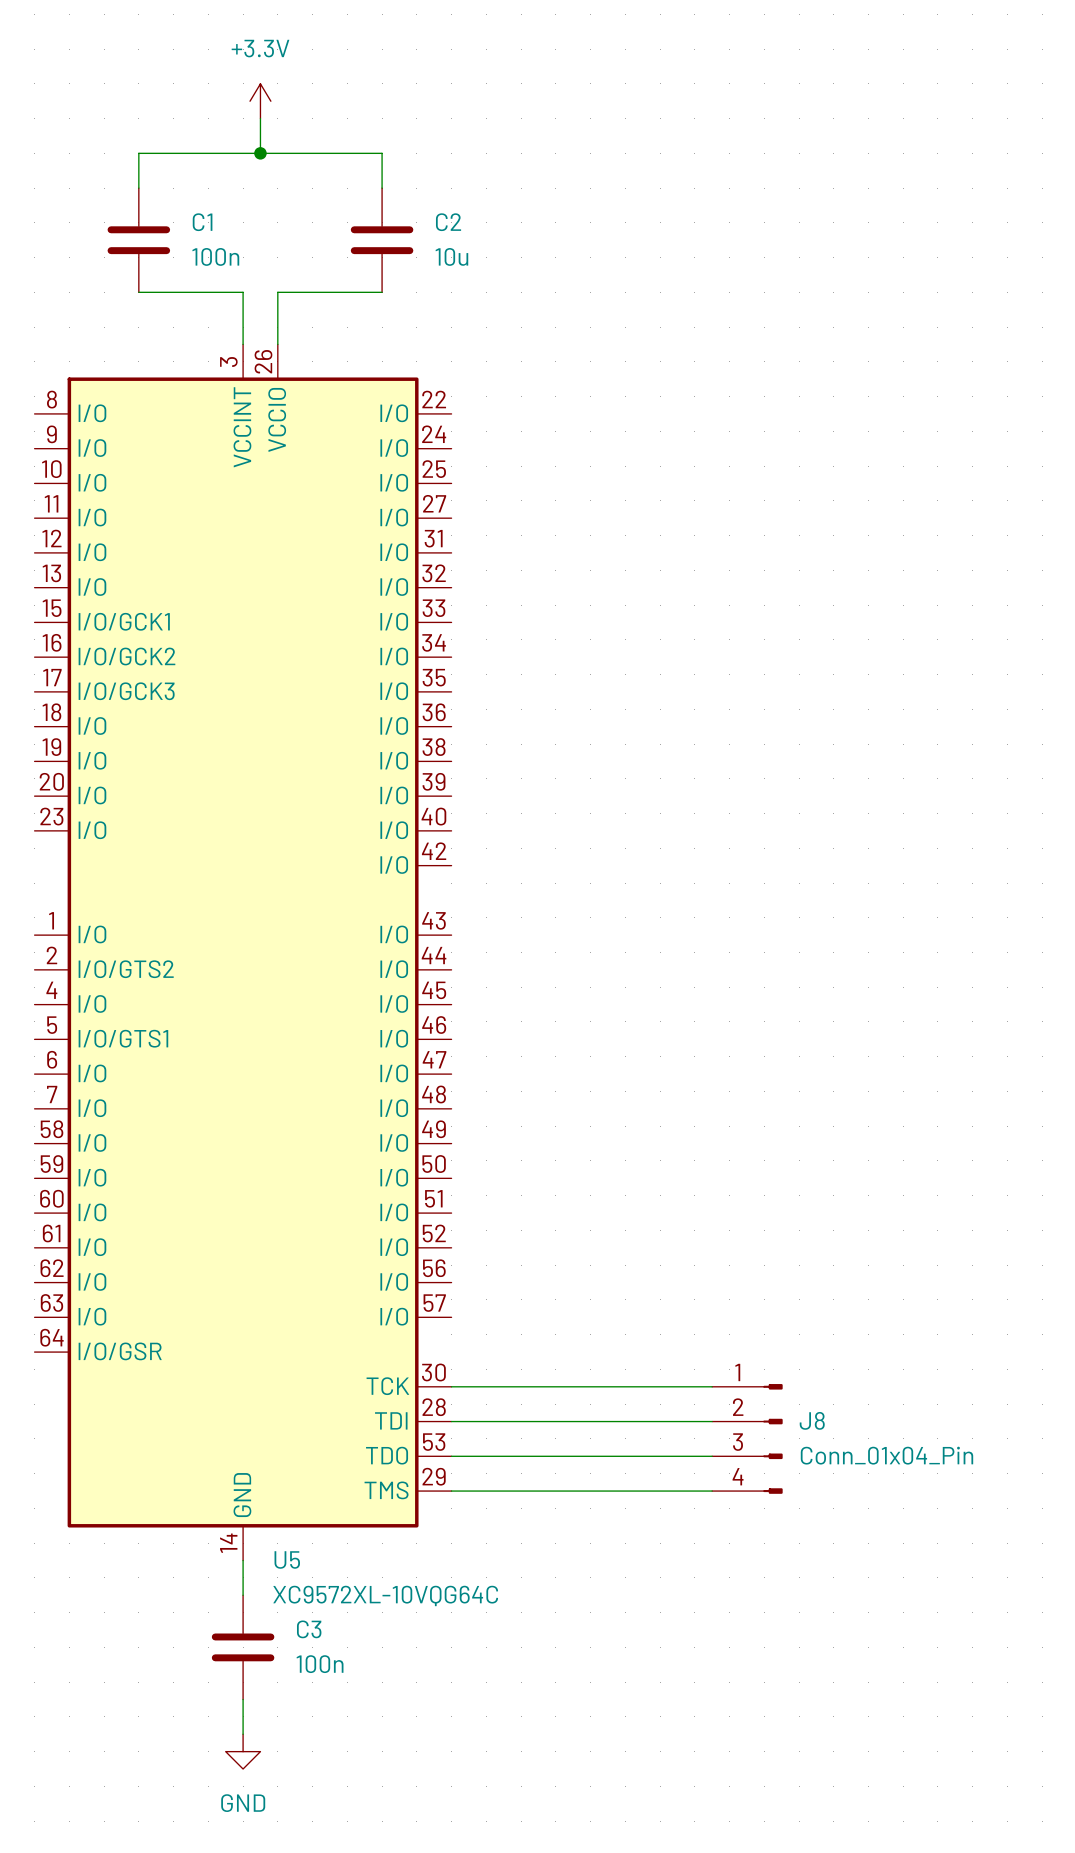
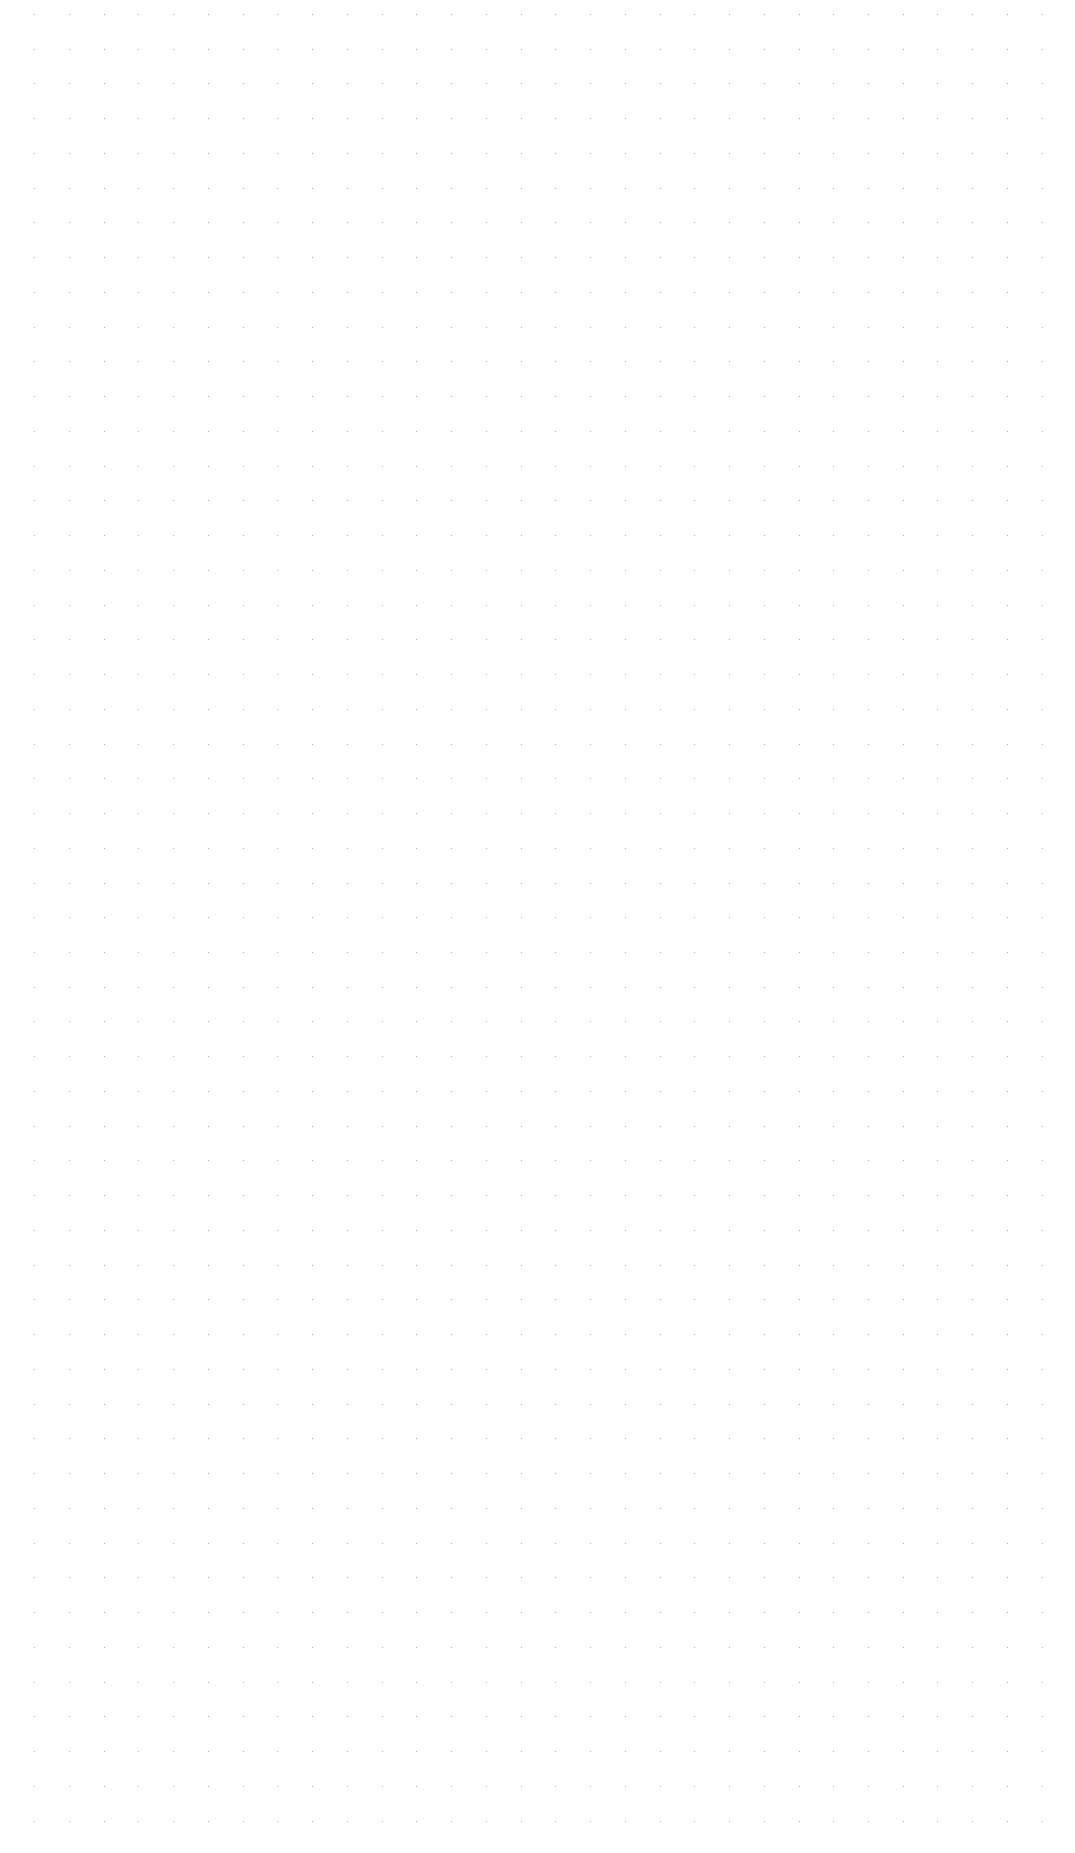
power symbol: +3.3V (260, 101) -> none
wire: (260, 118) (260, 153) -> none
junction: (260, 153) -> none
wire: (138, 188) (138, 153) (382, 153) (382, 188) -> none
C1: 100n (138, 240) -> none
C2: 10u (382, 240) -> none
wire: (138, 292) (243, 292) (243, 344) -> none
wire: (382, 292) (277, 292) (277, 344) -> none
U5: XC9572XL-10VQG64C (243, 952) -> none
wire: (451, 1386) (712, 1386) -> none
wire: (451, 1421) (712, 1421) -> none
J8: Conn_01x04_Pin (747, 1438) -> none
wire: (451, 1456) (712, 1456) -> none
wire: (451, 1491) (712, 1491) -> none
wire: (243, 1560) (243, 1595) -> none
C3: 100n (243, 1647) -> none
wire: (243, 1699) (243, 1734) -> none
power symbol: GND (243, 1751) -> none

